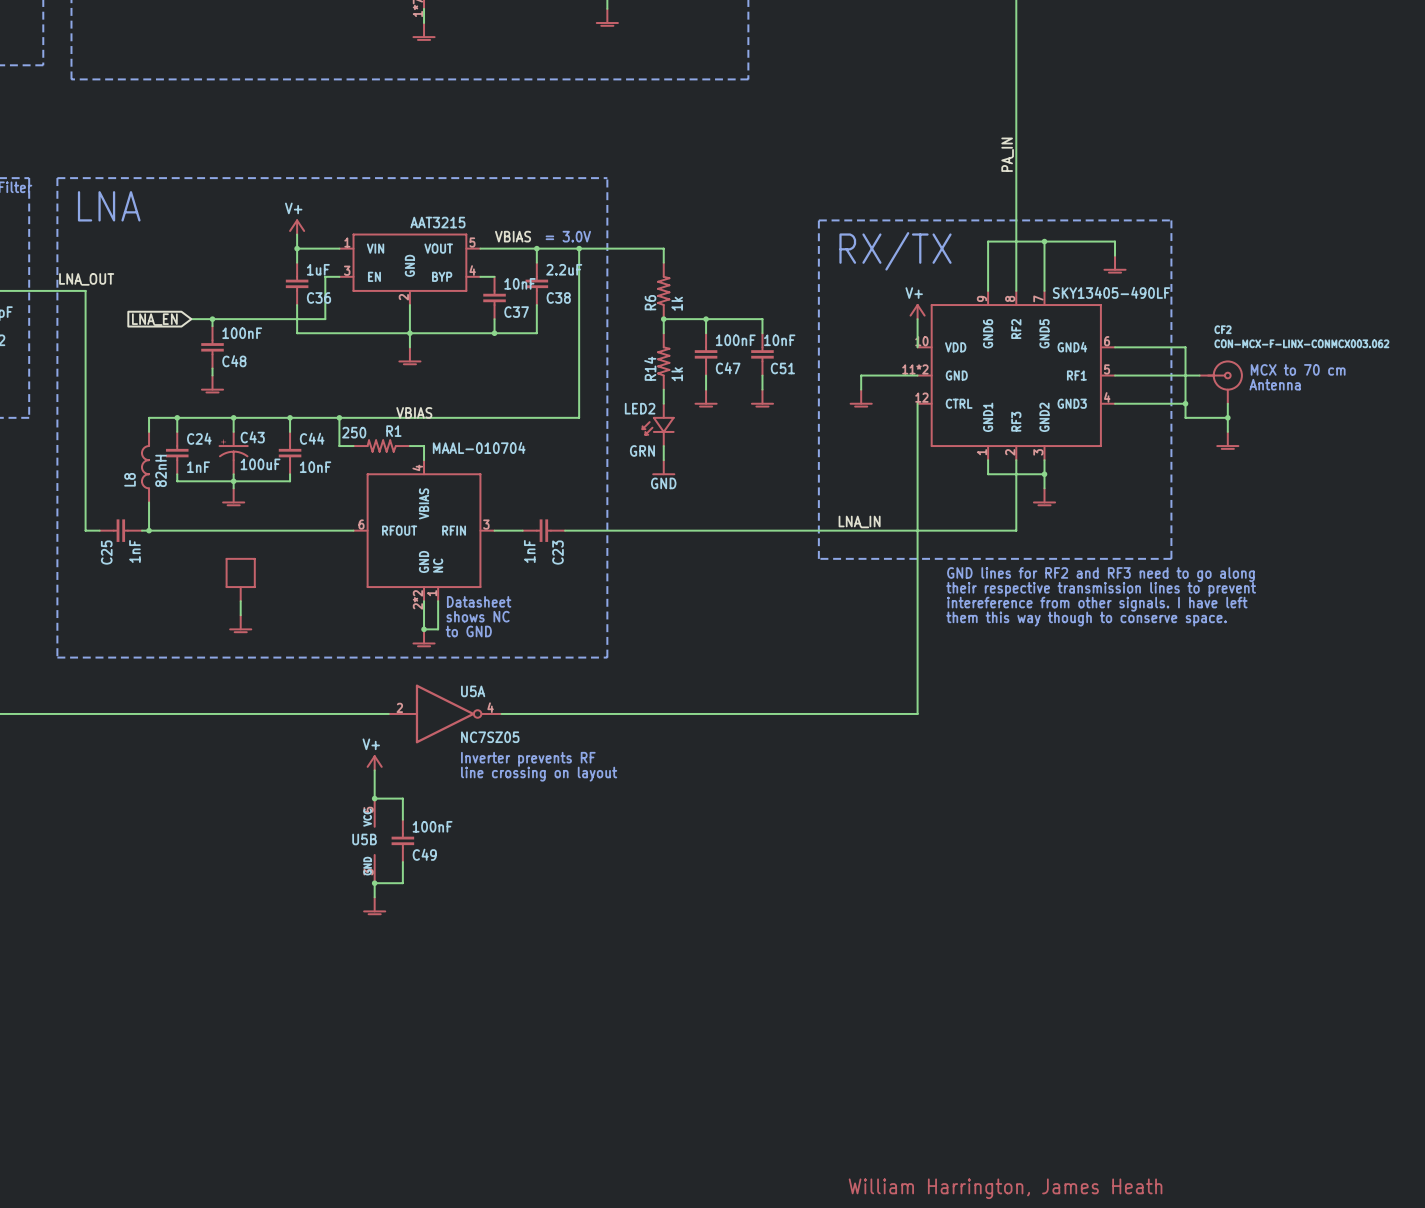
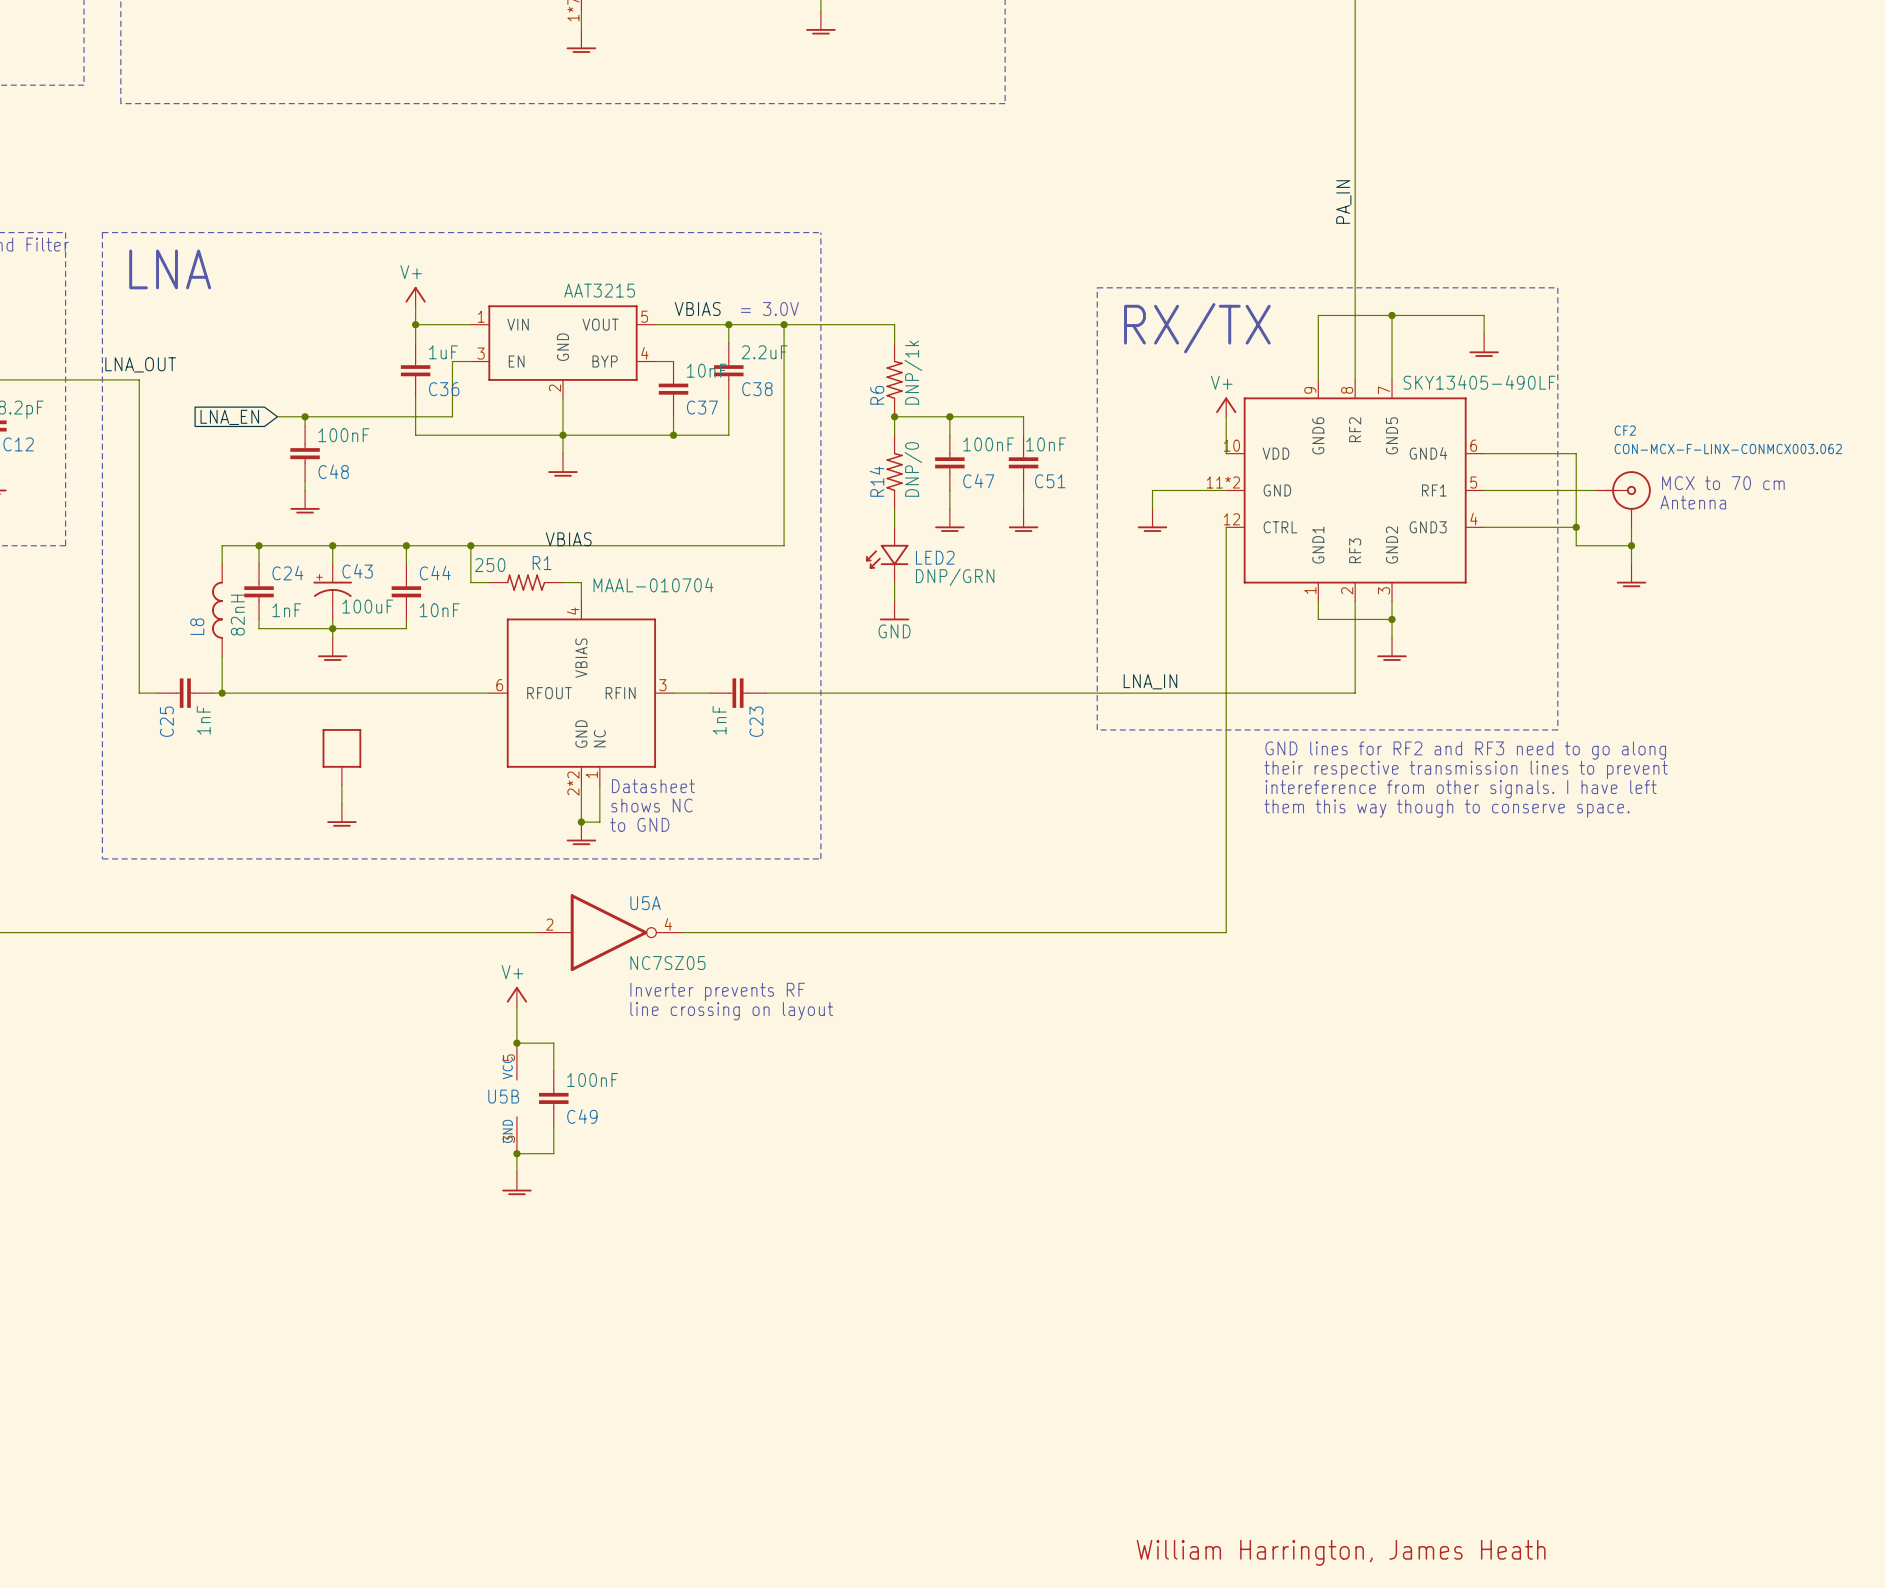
R6 value: 1k (677, 303) -> DNP/1k (913, 372)
R14 value: 1k (677, 374) -> DNP/0 (913, 469)
LED2 name position: LED2 (640, 408) -> LED2 (935, 557)
LED2 value: GRN (642, 450) -> DNP/GRN (955, 577)

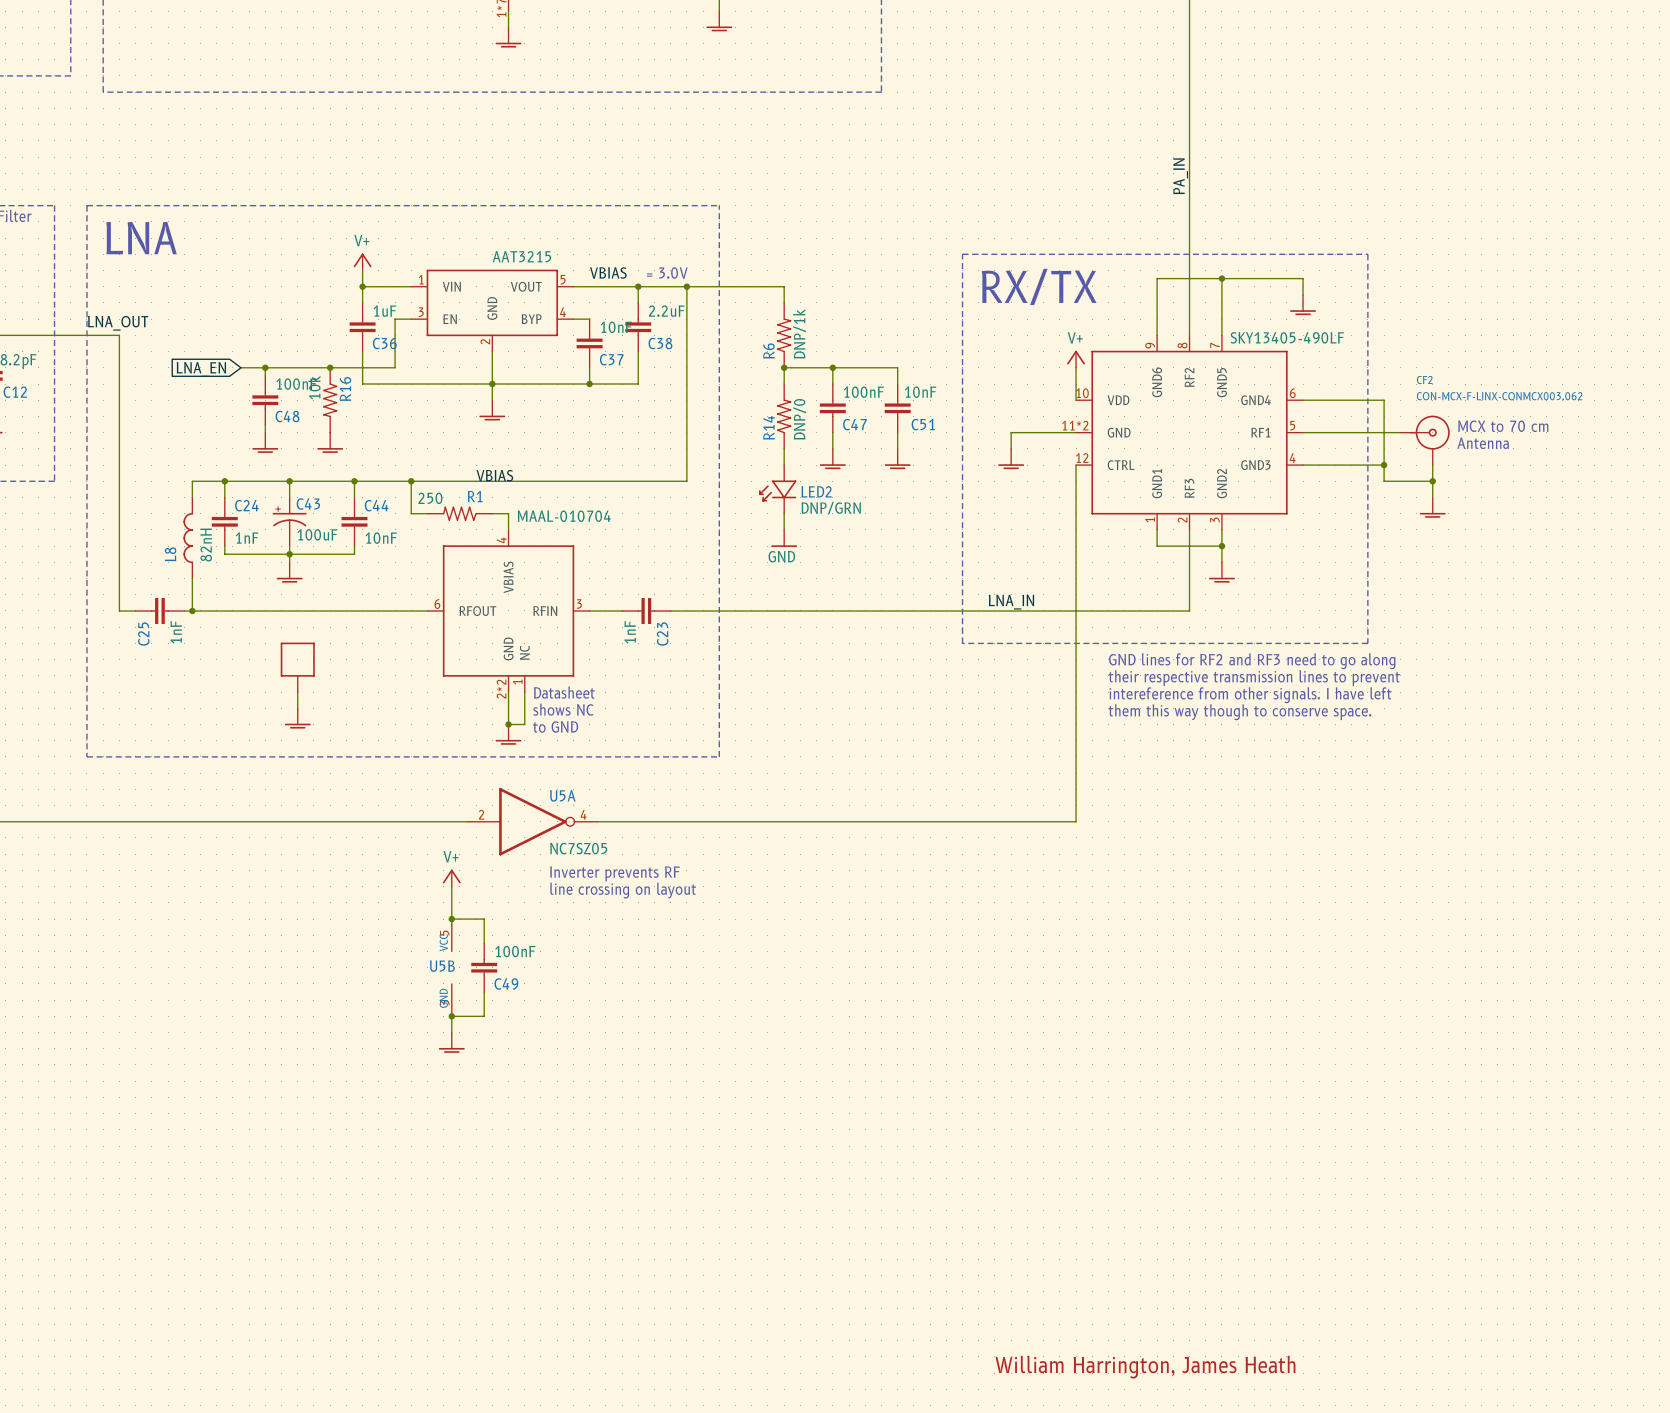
junction: none -> (330, 367)
R16: none -> 10k (330, 400)
power symbol: none -> (330, 442)

